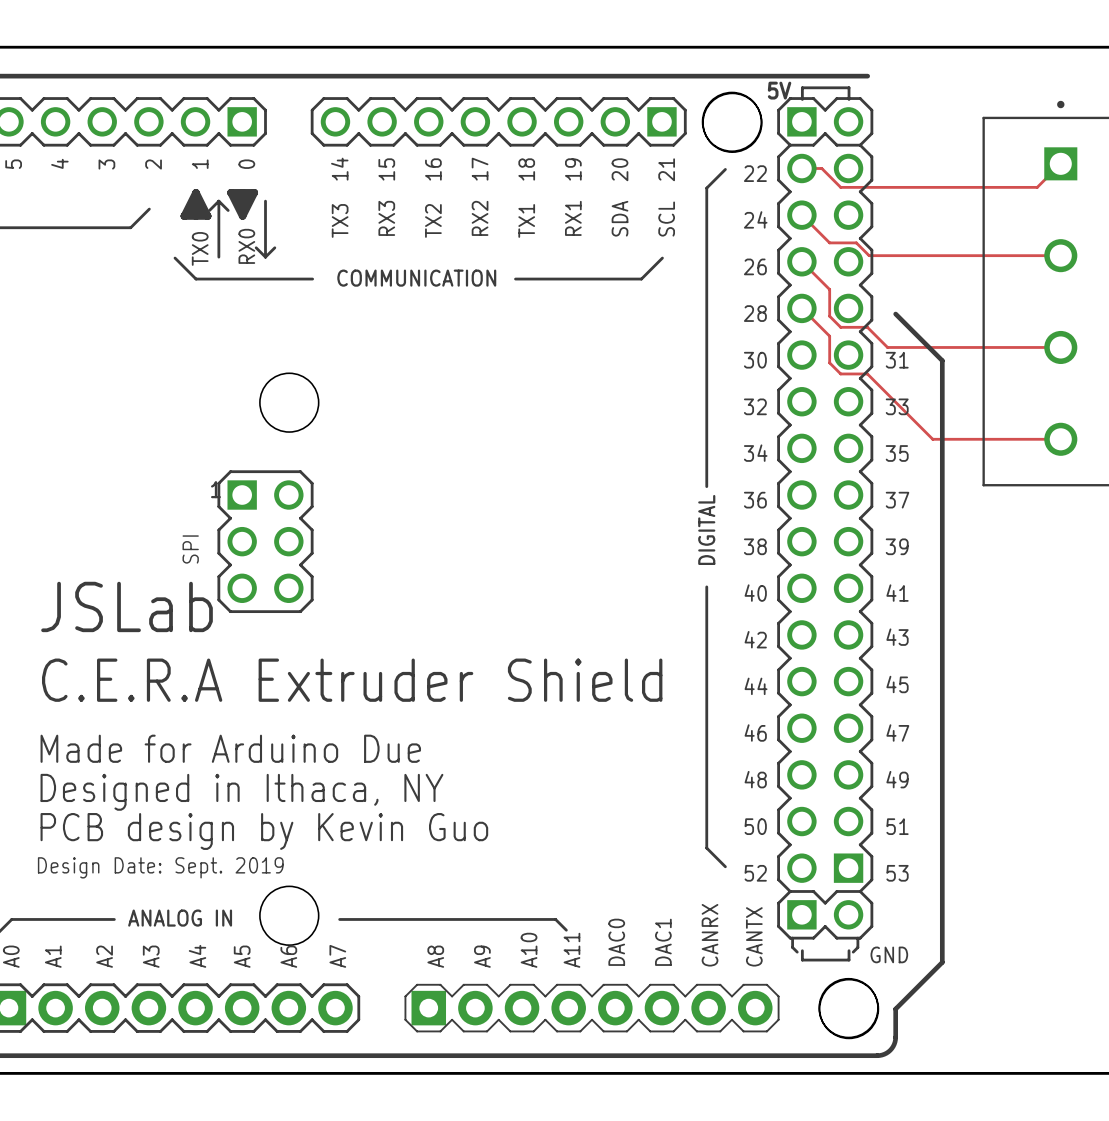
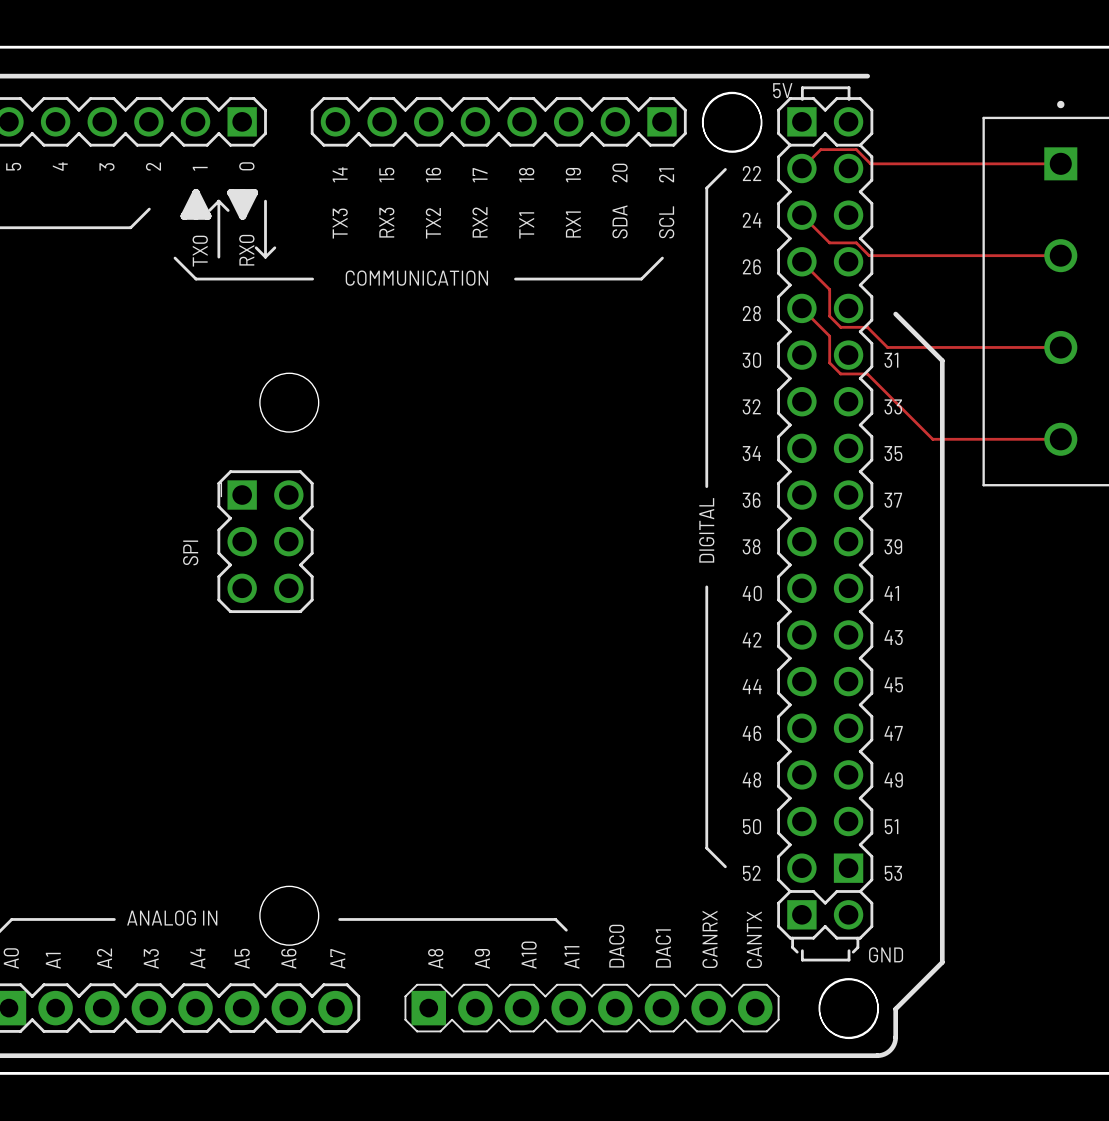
track: (1060, 163) (1037, 187) (840, 187) (821, 168) (801, 168) -> (1060, 163) (870, 163) (856, 149) (820, 149) (801, 168)
text: JSLab (127, 606) -> none
text: C.E.R.A Extruder Shield (352, 680) -> none
text: Made for Arduino Due (230, 748) -> none
text: Designed in Ithaca, NY (241, 792) -> none
text: PCB design by Kevin Guo (264, 831) -> none
text: Design Date: Sept. 2019 (160, 867) -> none

